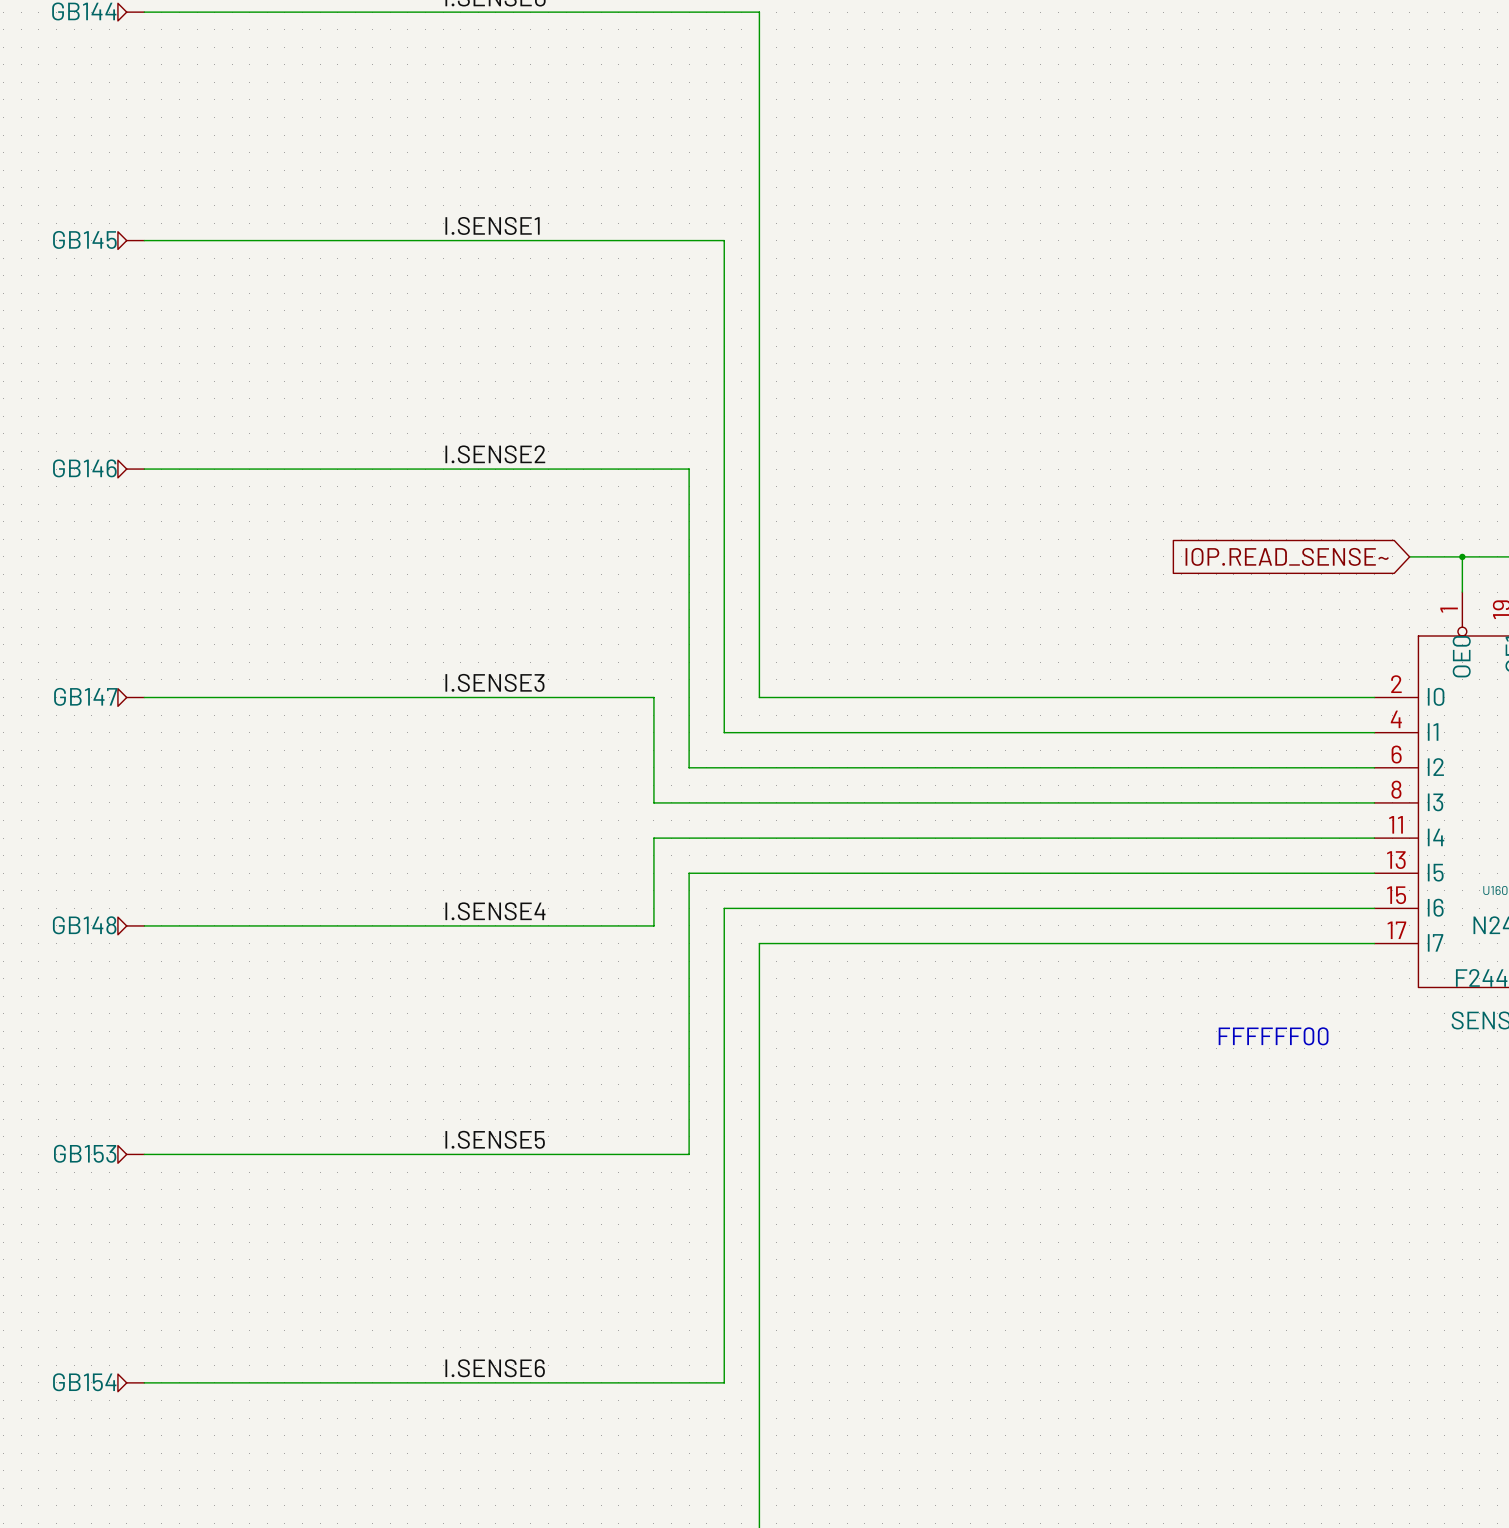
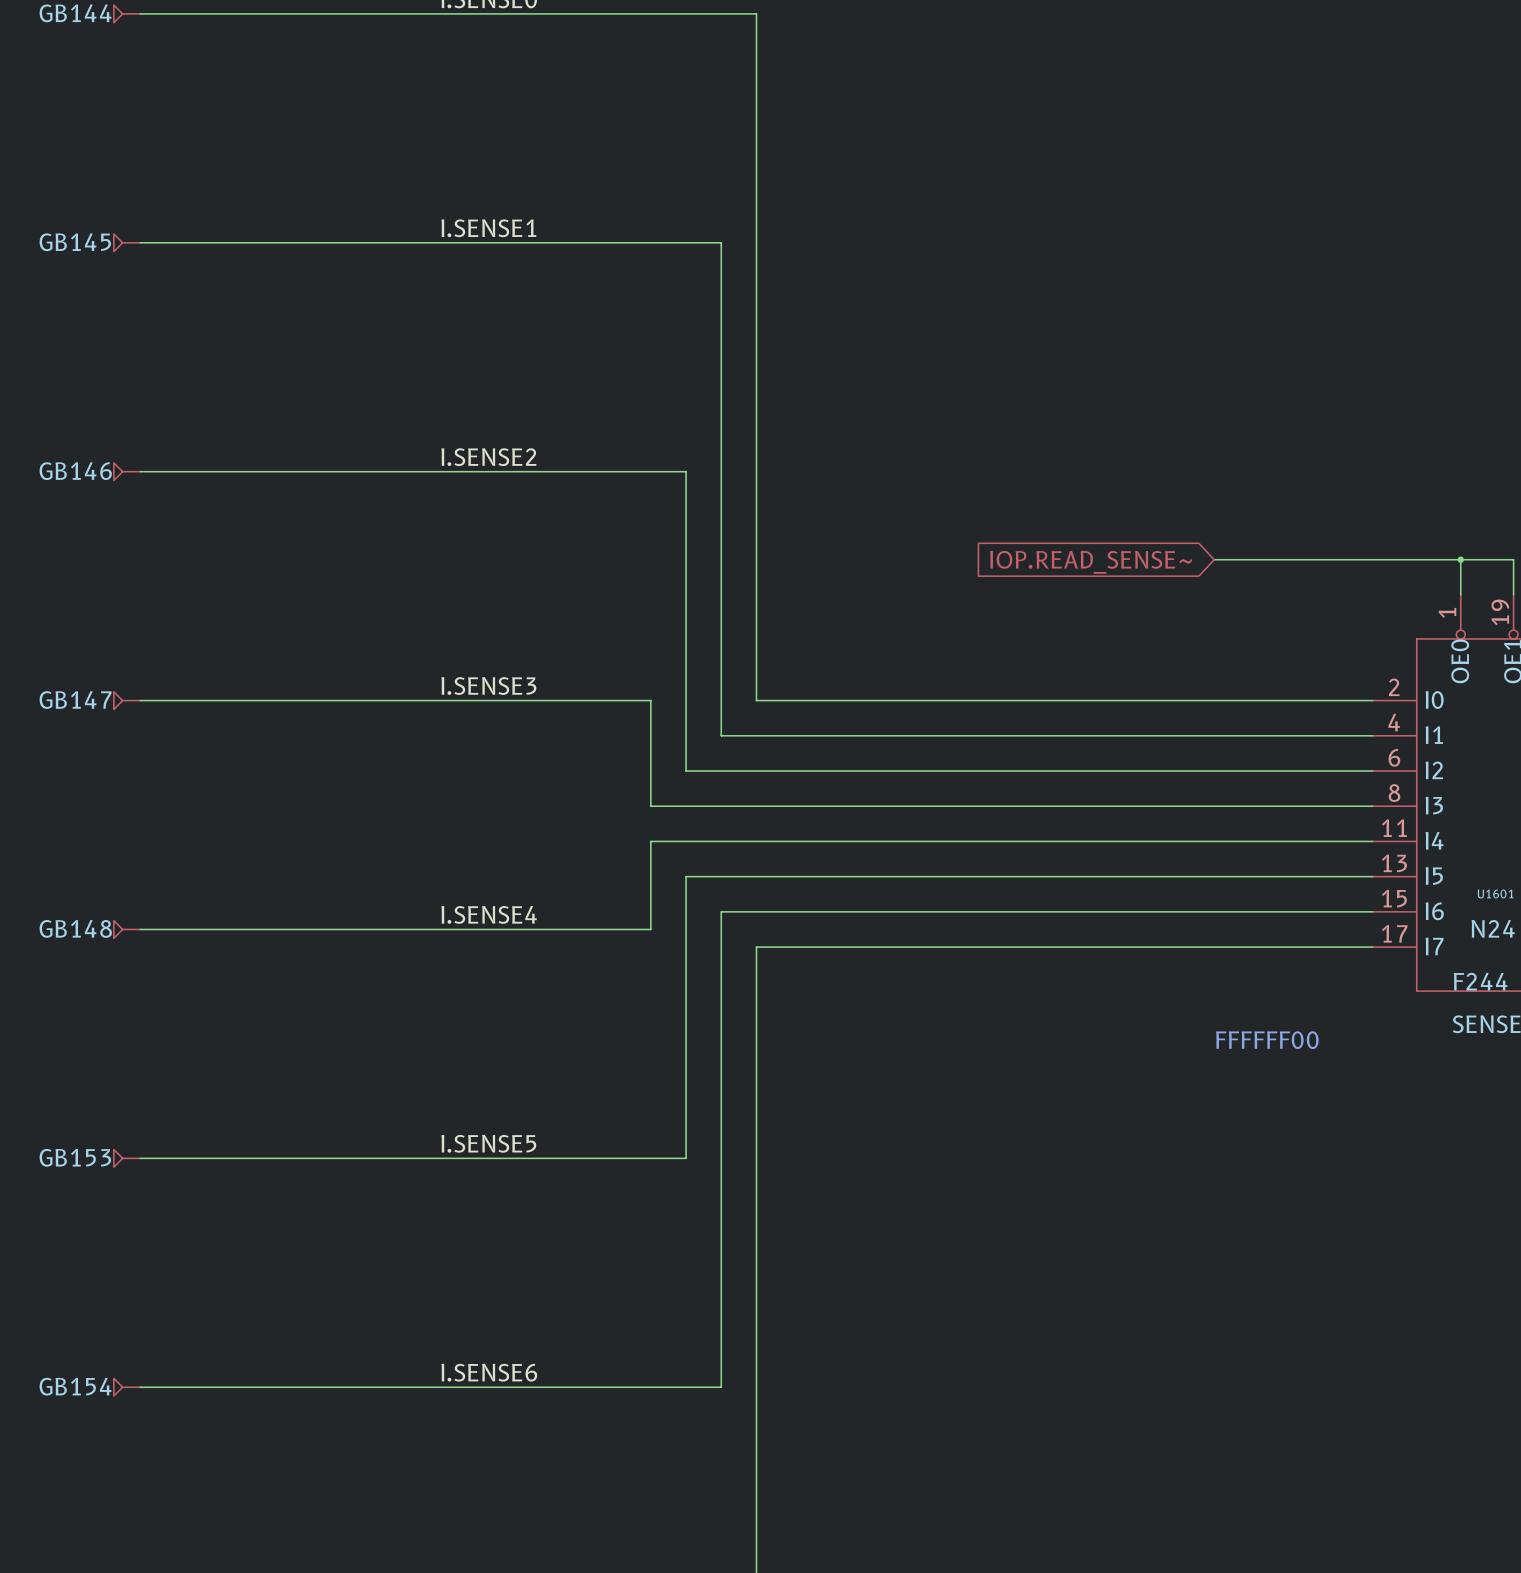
global label: none -> IOP.READ_SENSE~ (1091, 562)
wire: none -> (1214, 559) (1407, 559)
global label: IOP.READ_SENSE~ (1287, 556) -> none

